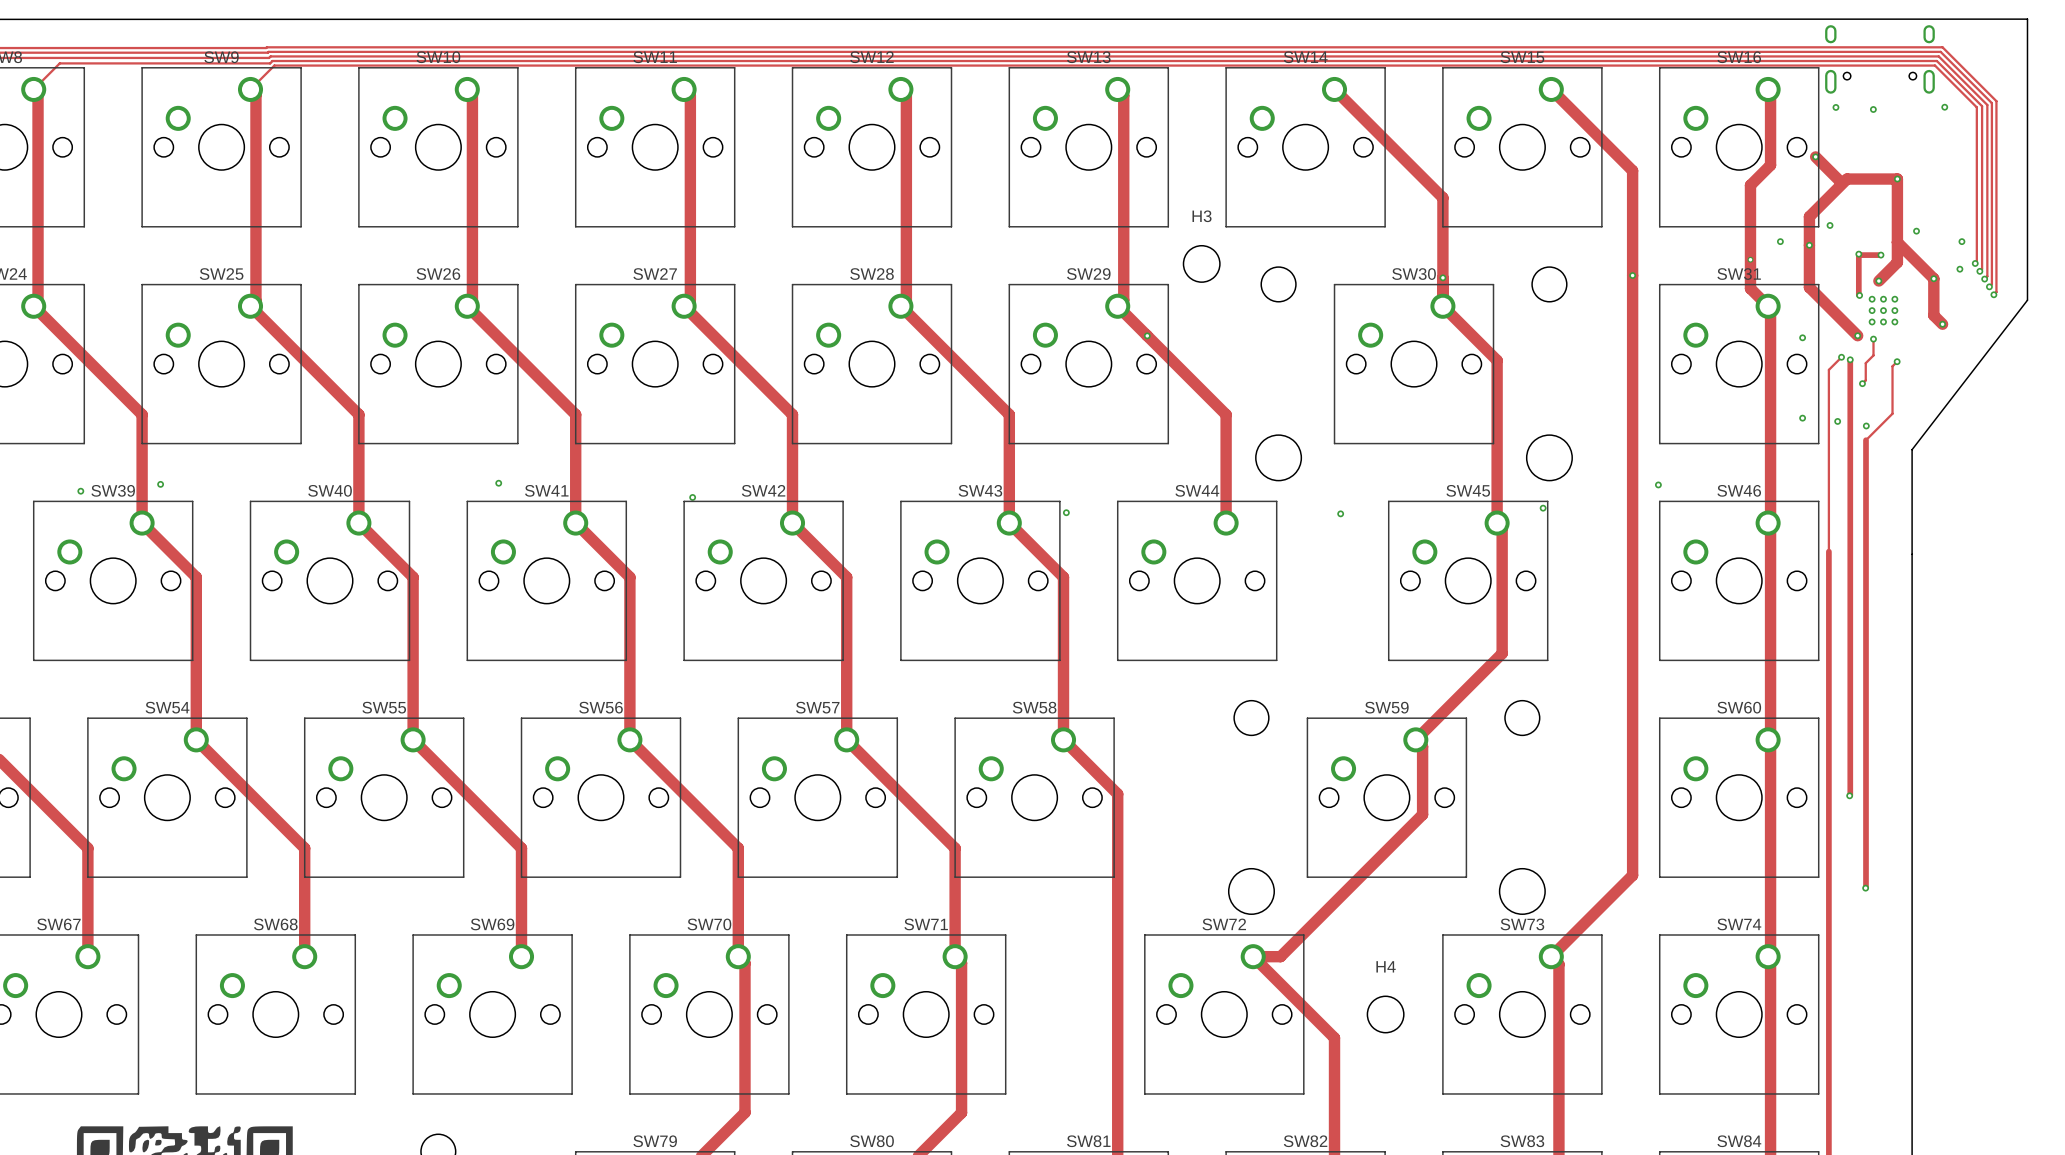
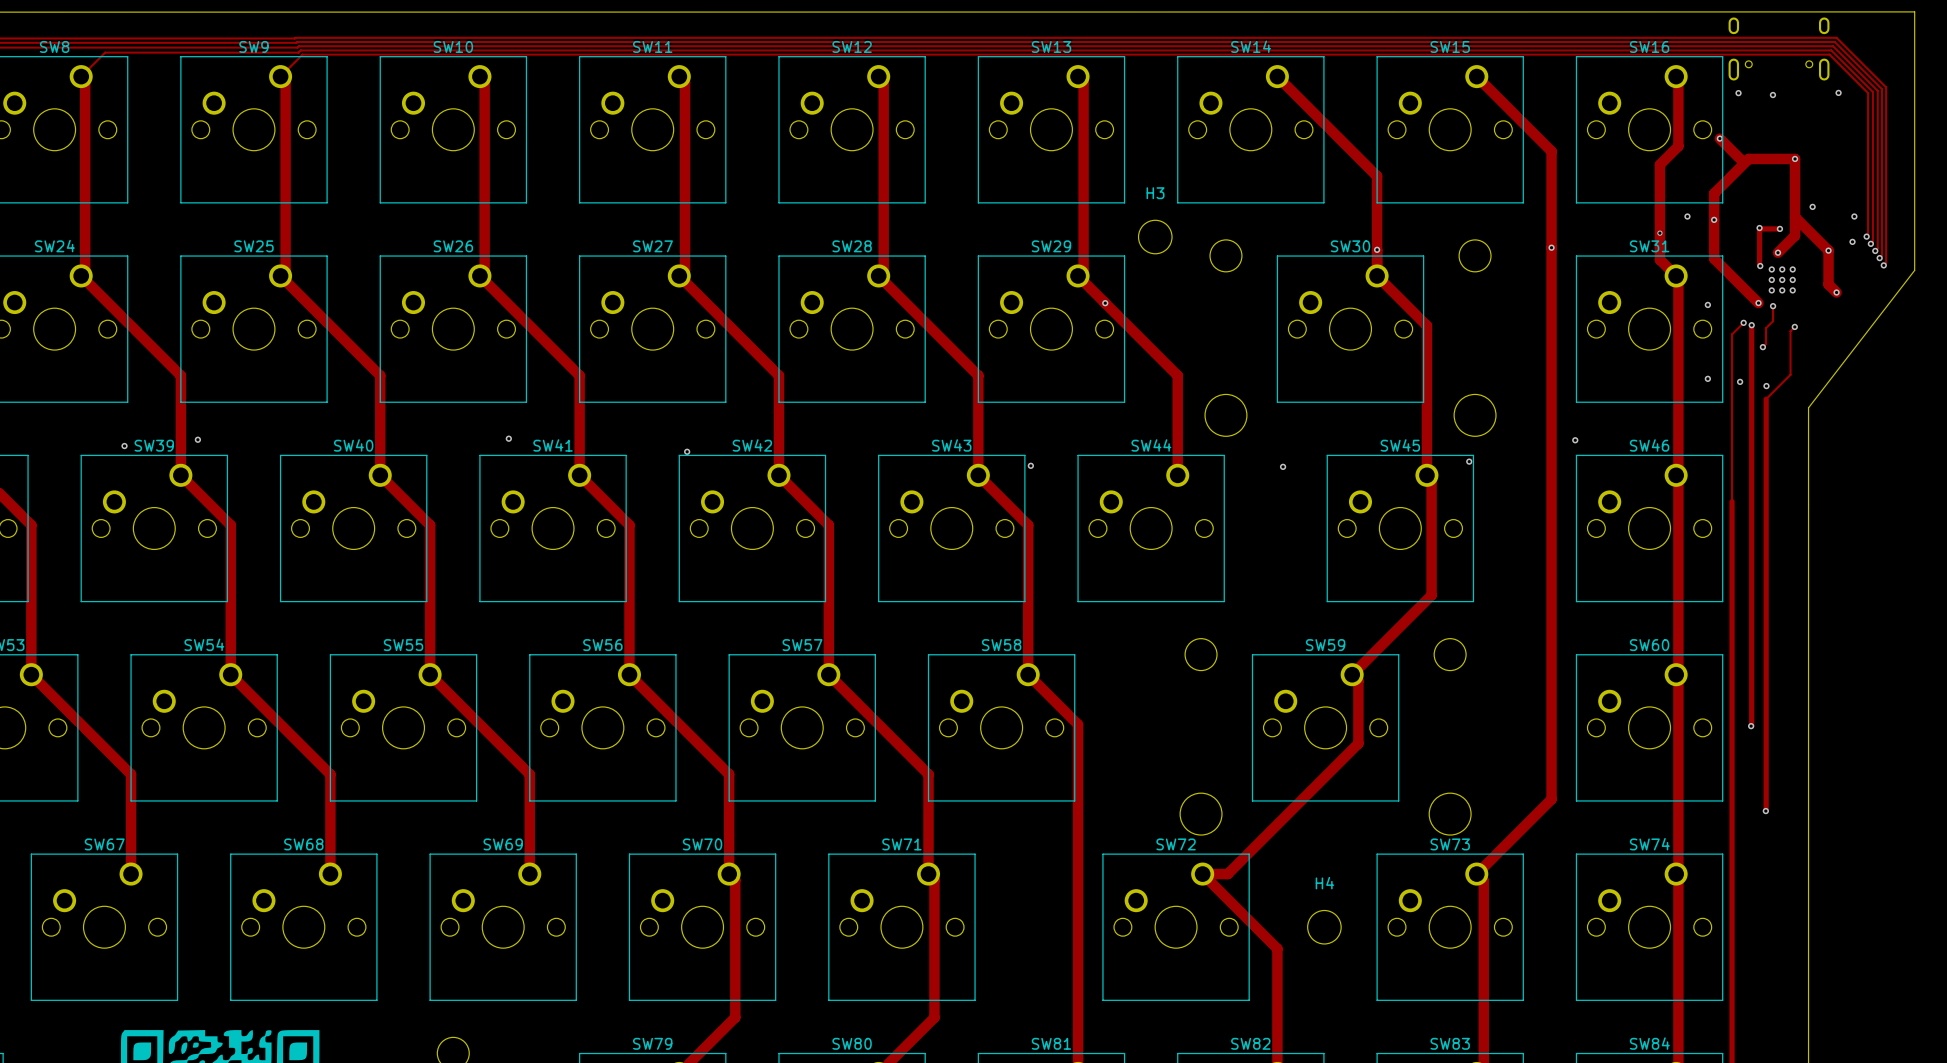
via: (1830, 225) -> none

